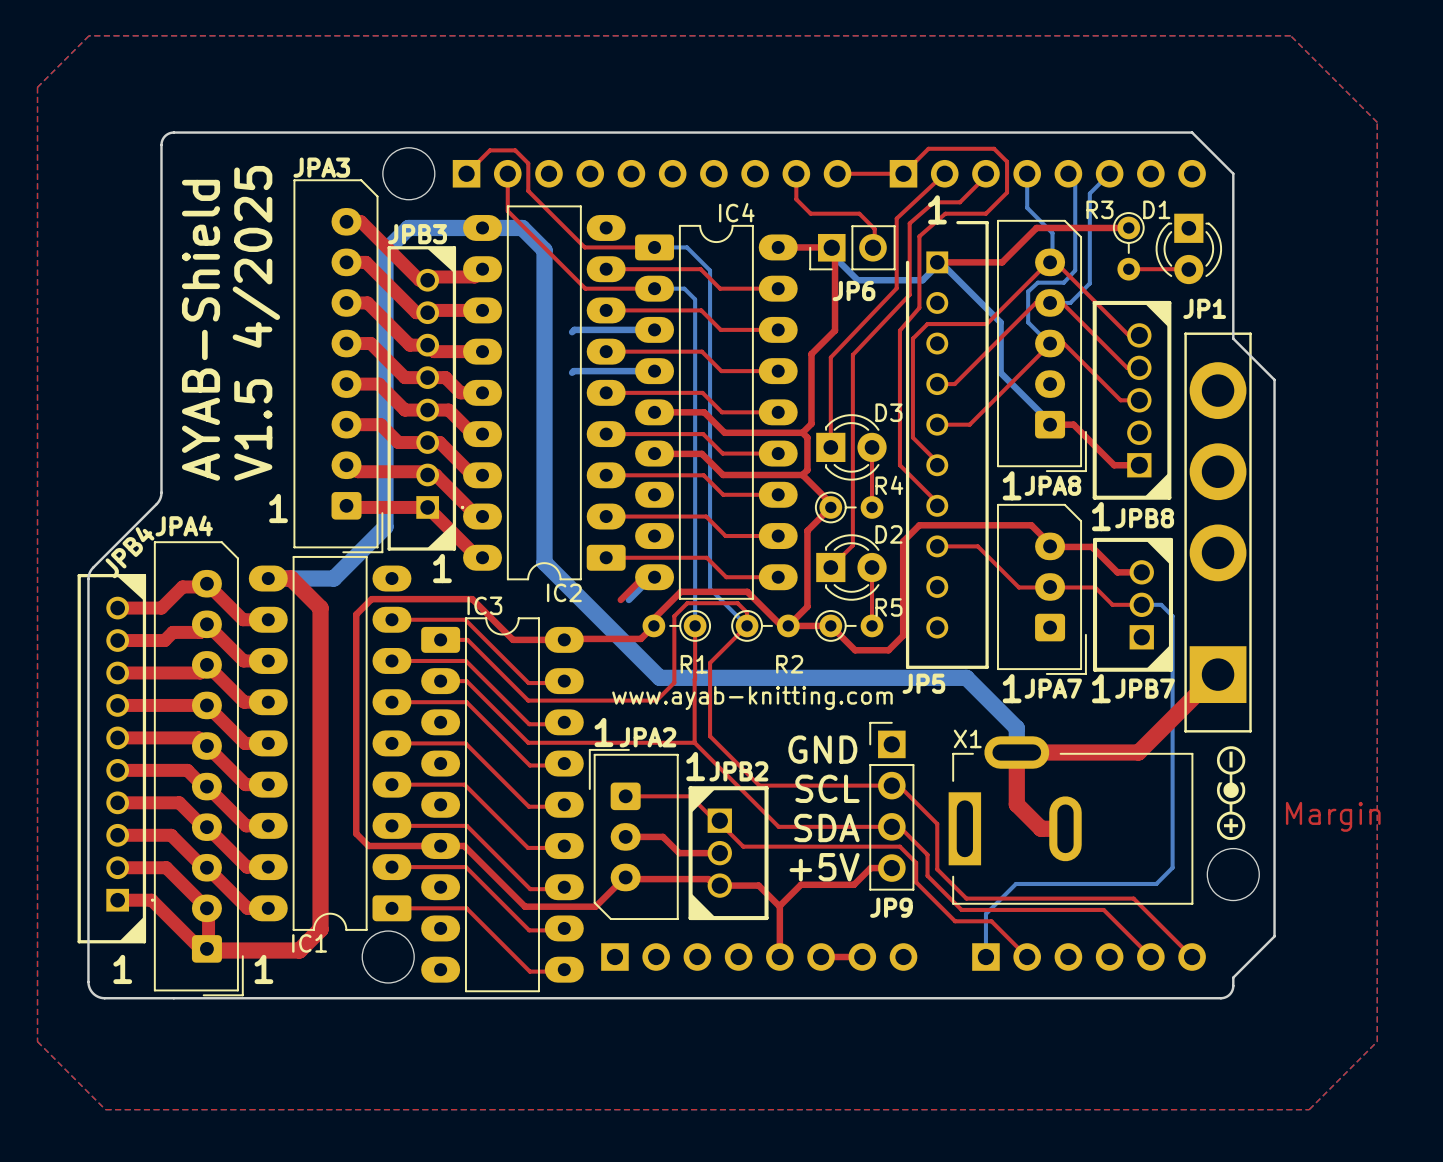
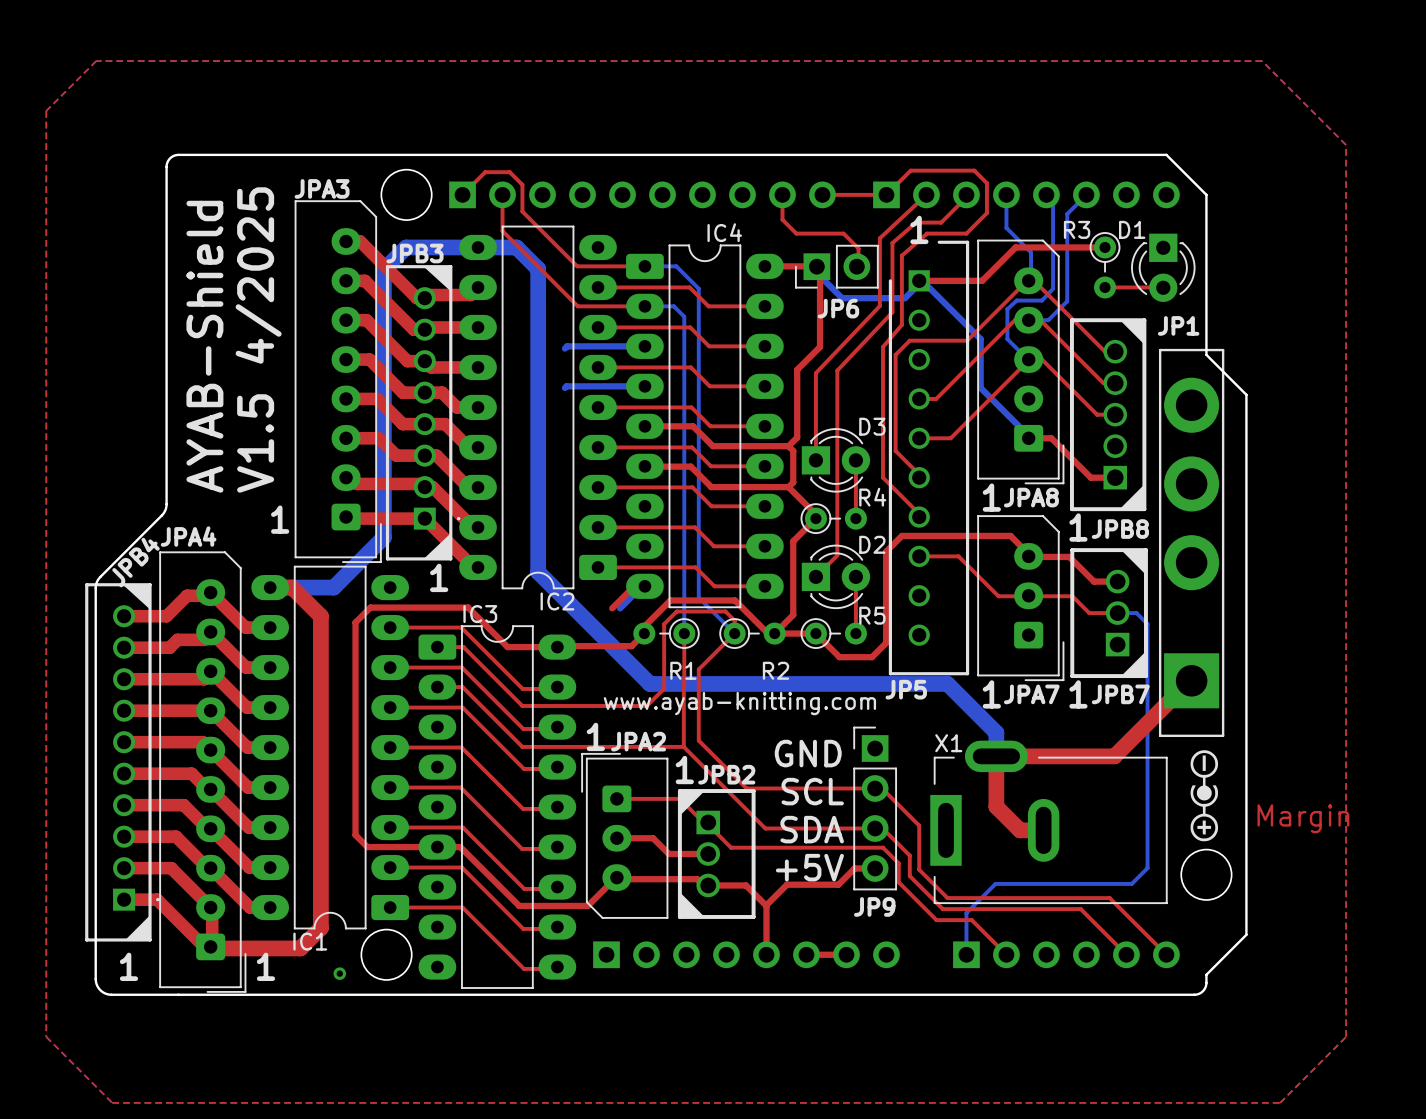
via: none -> (339, 973)

